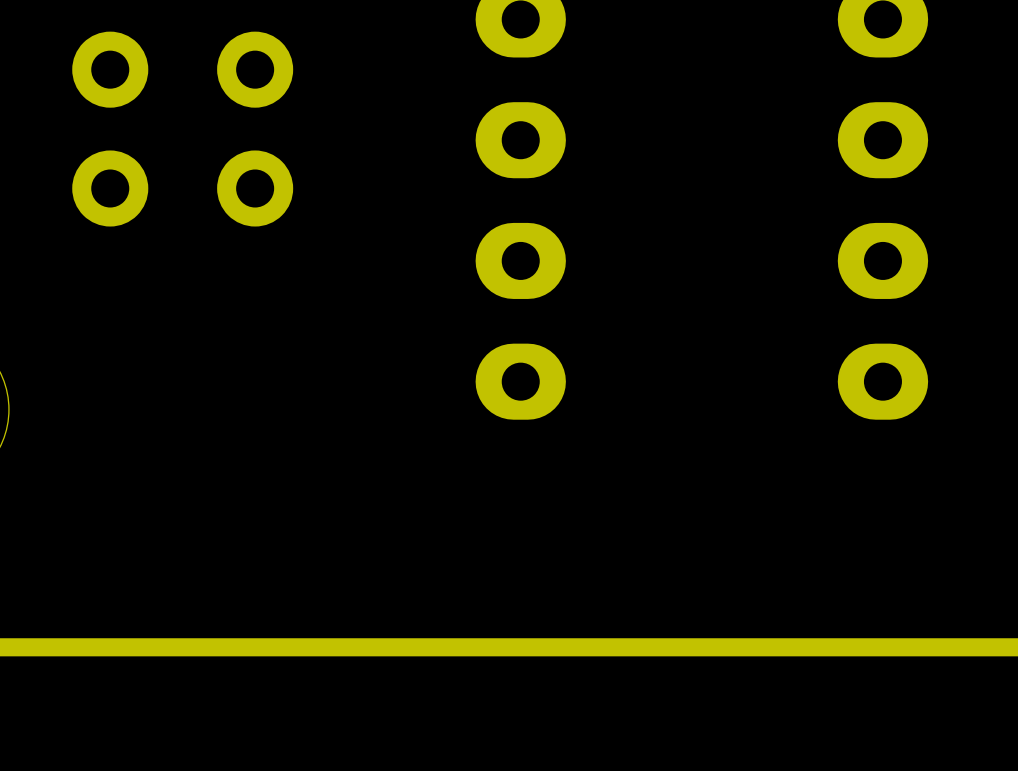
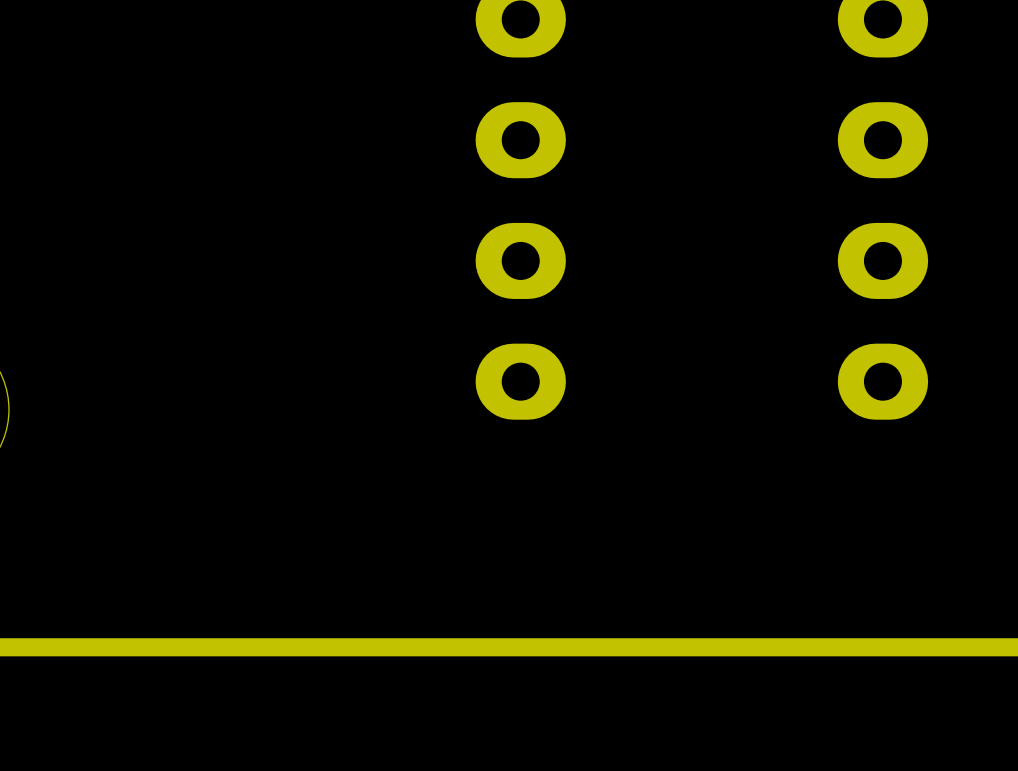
part: (110, 129) -> none
part: (255, 129) -> none

